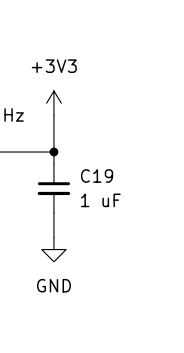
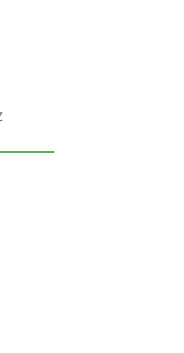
power symbol: +3V3 (53, 103) -> none
wire: (53, 115) (53, 164) -> none
junction: (53, 152) -> none
C19: 1 uF (53, 188) -> none
wire: (53, 213) (53, 237) -> none
power symbol: GND (53, 249) -> none

